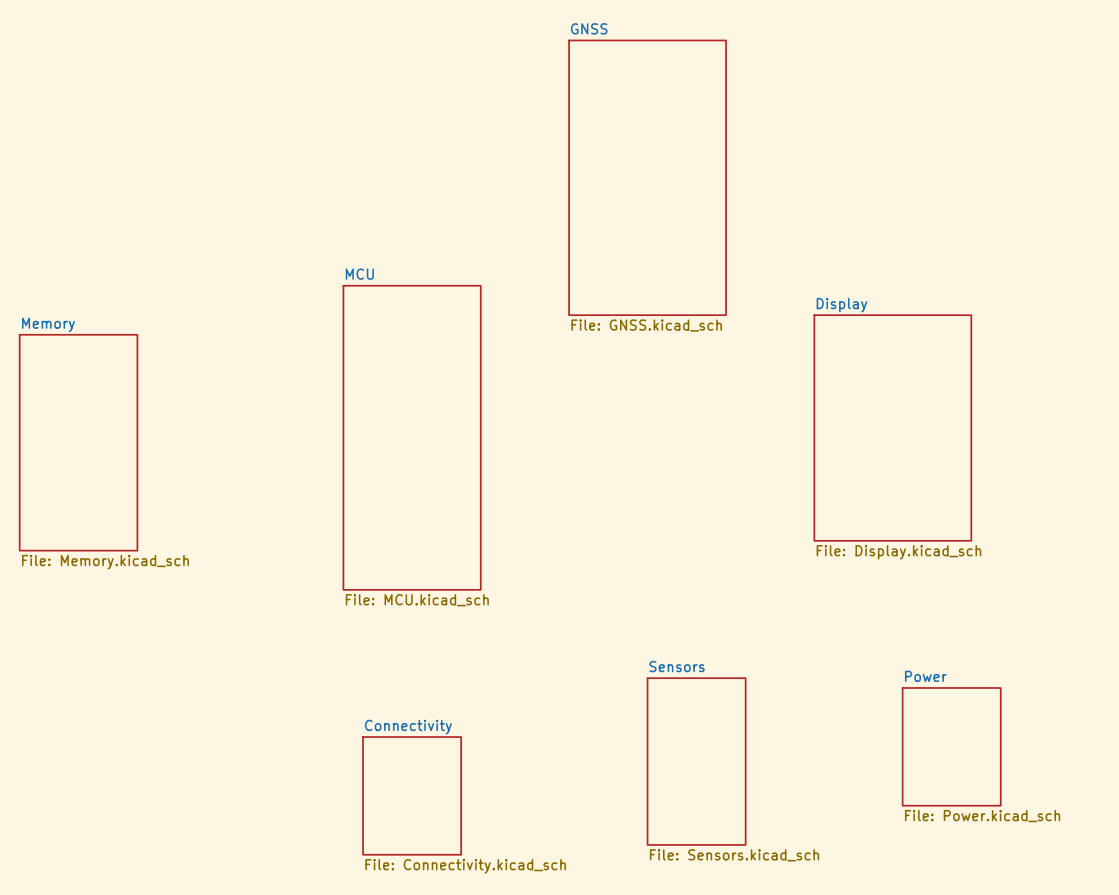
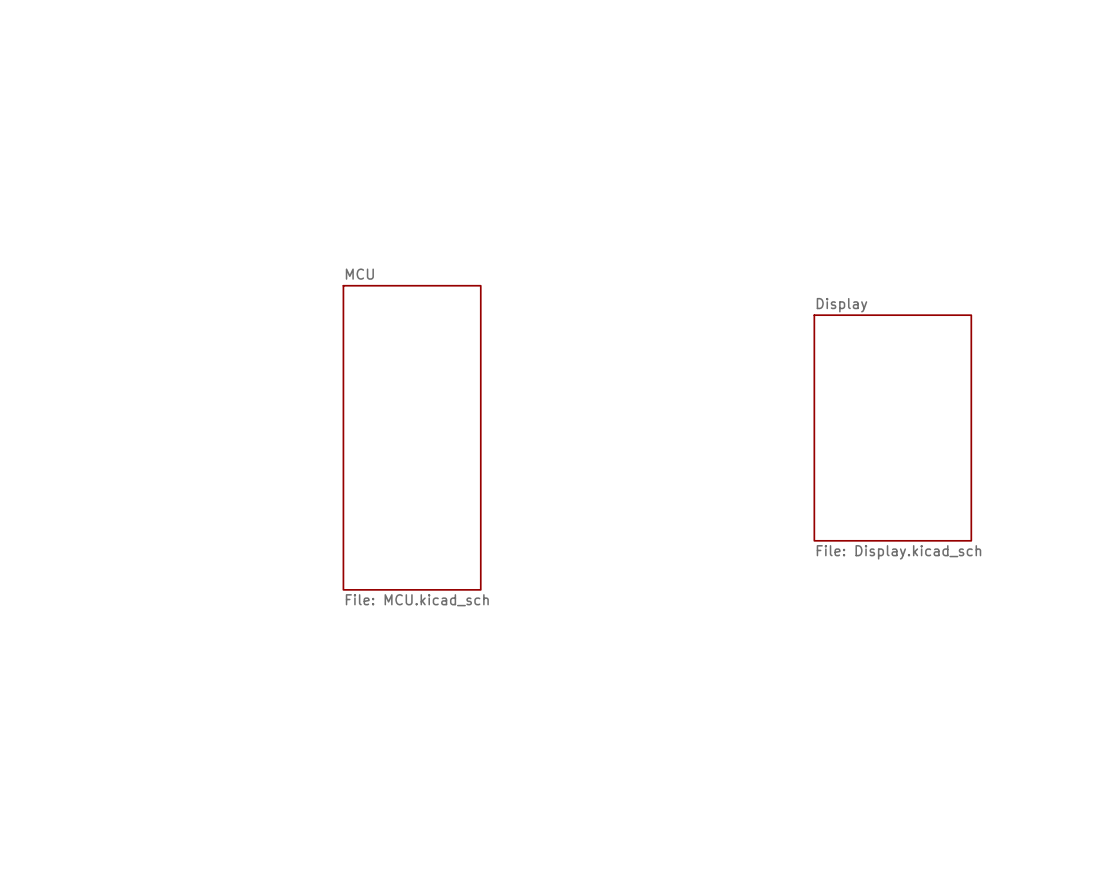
sheet GNSS: File: GNSS.kicad_sch (647, 177) -> none
sheet Memory: File: Memory.kicad_sch (78, 442) -> none
sheet Power: File: Power.kicad_sch (951, 746) -> none
sheet Sensors: File: Sensors.kicad_sch (696, 761) -> none
sheet Connectivity: File: Connectivity.kicad_sch (412, 795) -> none

